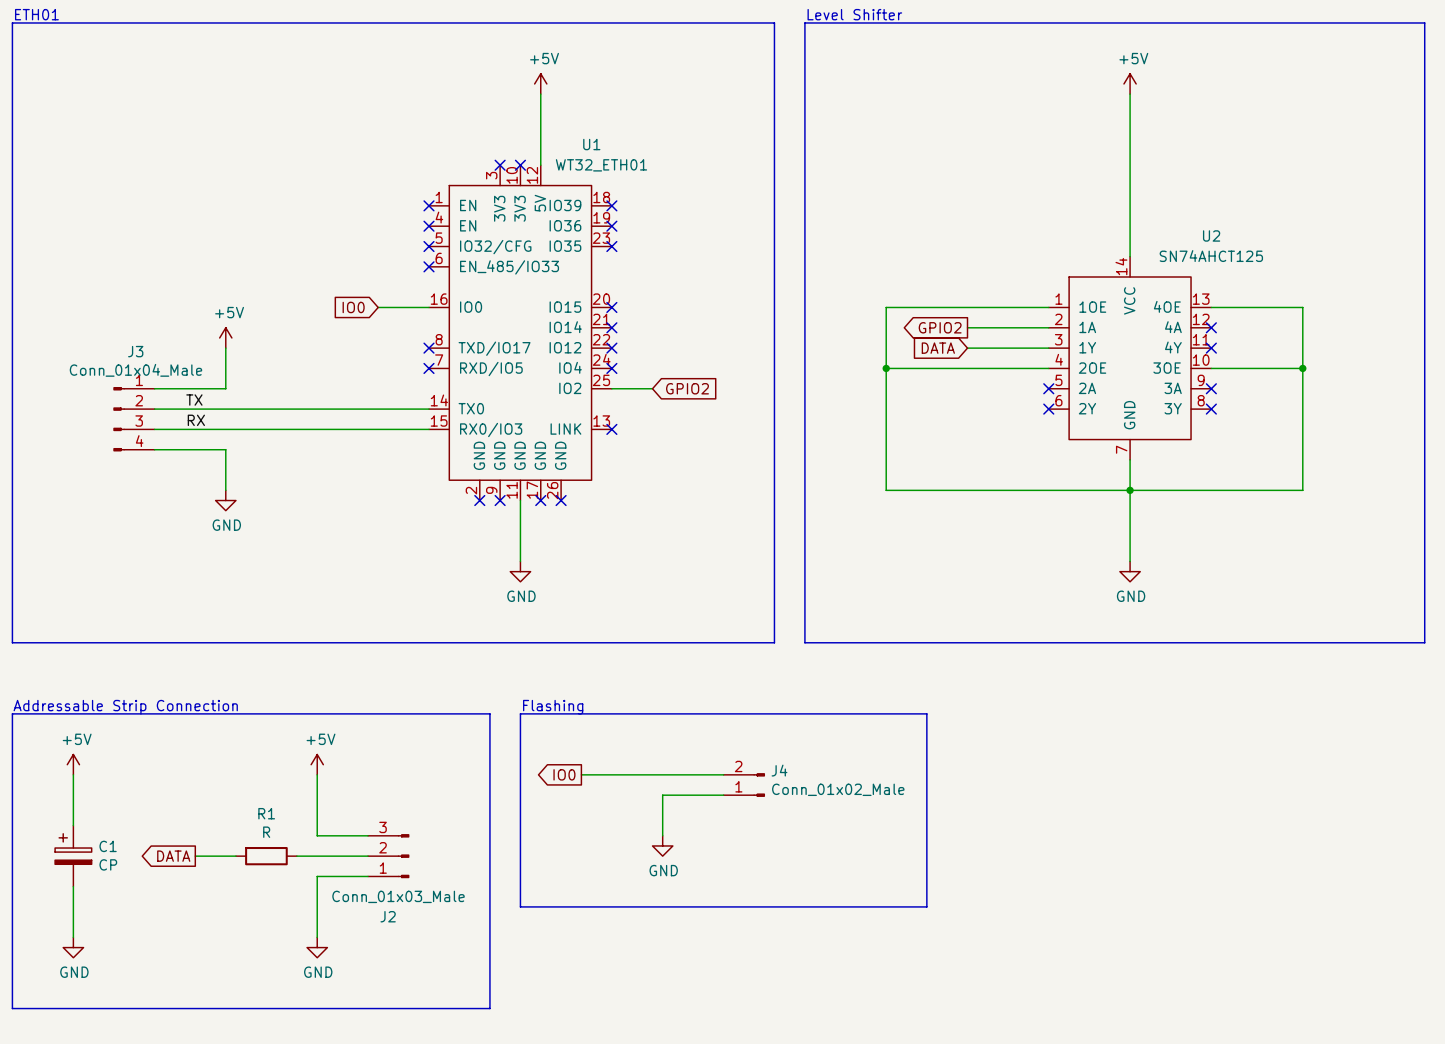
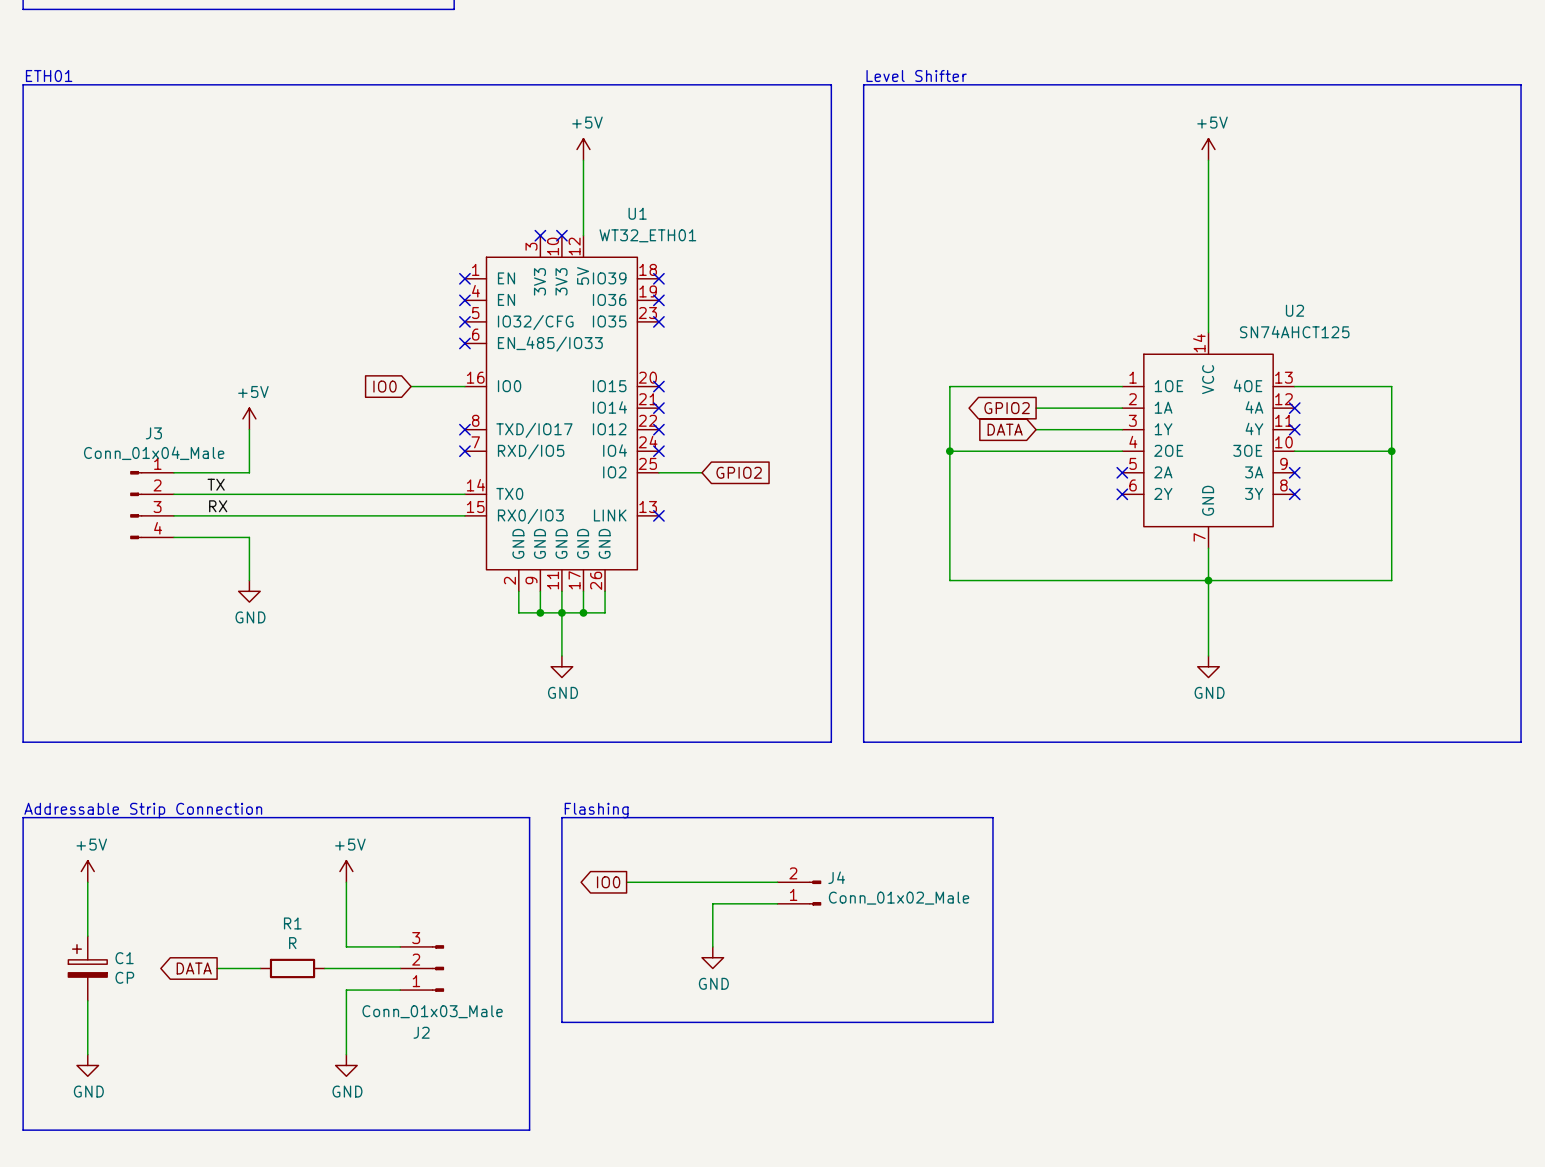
wire: none -> (518, 591) (518, 612) (605, 612) (605, 591)
no-connect mark: (479, 500) -> none
wire: none -> (540, 591) (540, 612)
no-connect mark: (500, 500) -> none
wire: none -> (583, 591) (583, 612)
no-connect mark: (540, 500) -> none
no-connect mark: (561, 500) -> none
junction: none -> (540, 612)
junction: none -> (561, 612)
junction: none -> (583, 612)

